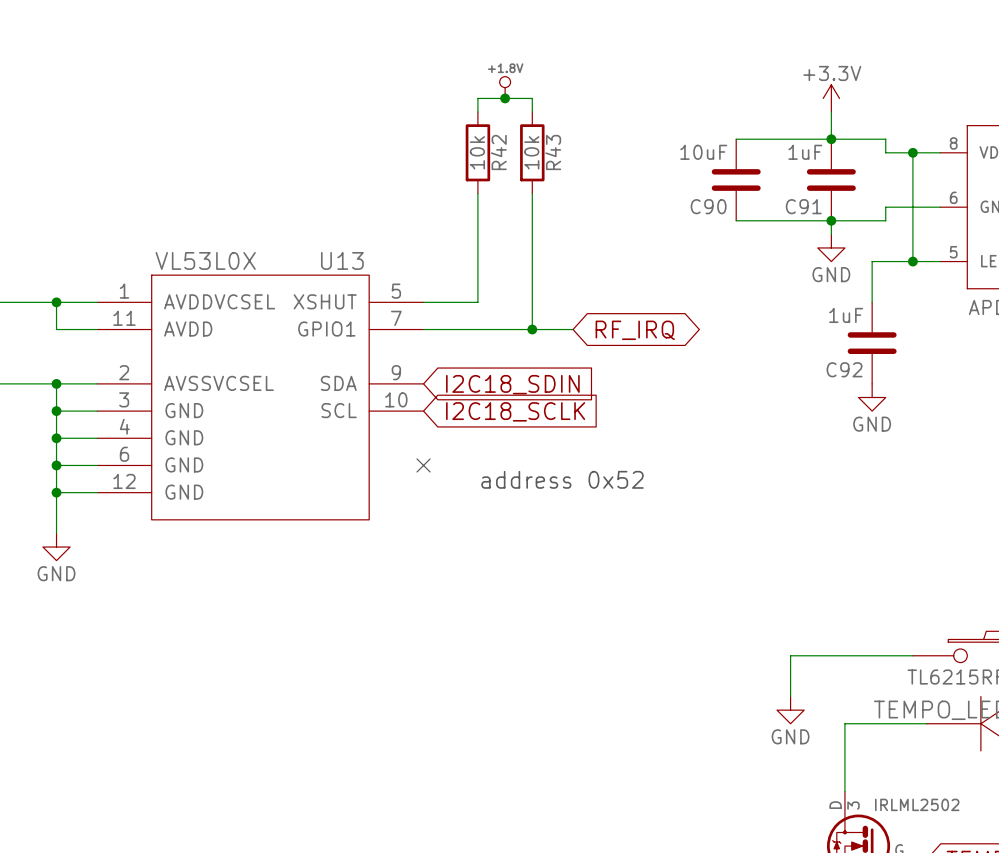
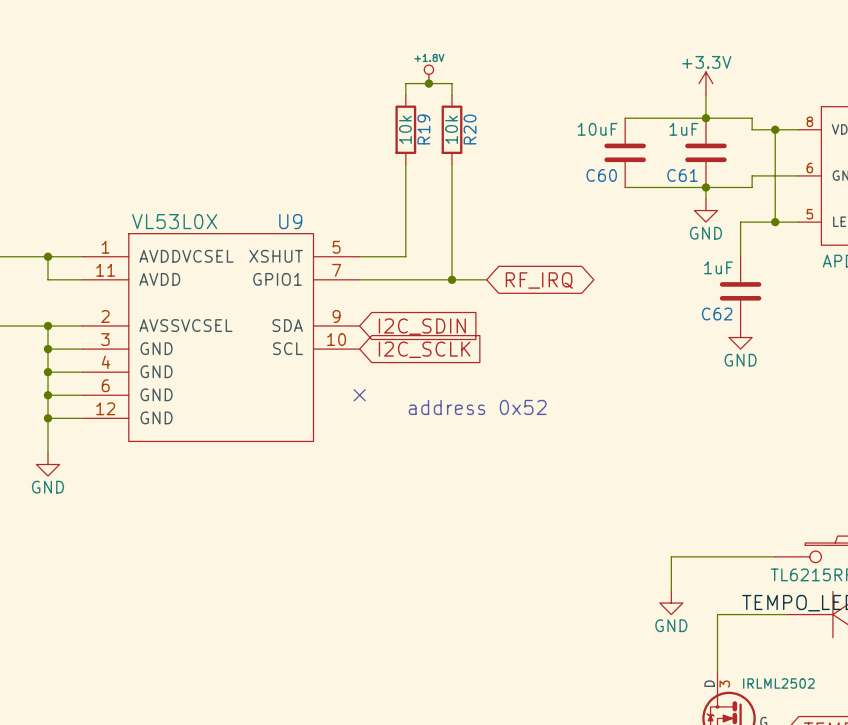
R42 name: R42 (498, 152) -> R19 (423, 129)
R43 name: R43 (553, 152) -> R20 (470, 129)
C90 name: C90 (708, 206) -> C60 (601, 175)
C91 name: C91 (803, 206) -> C61 (682, 175)
U13 name: U13 (342, 260) -> U9 (290, 221)
C92 name: C92 (844, 369) -> C62 (717, 314)
global label: I2C18_SDIN (512, 384) -> I2C_SDIN (422, 326)
global label: I2C18_SCLK (515, 411) -> I2C_SCLK (424, 349)

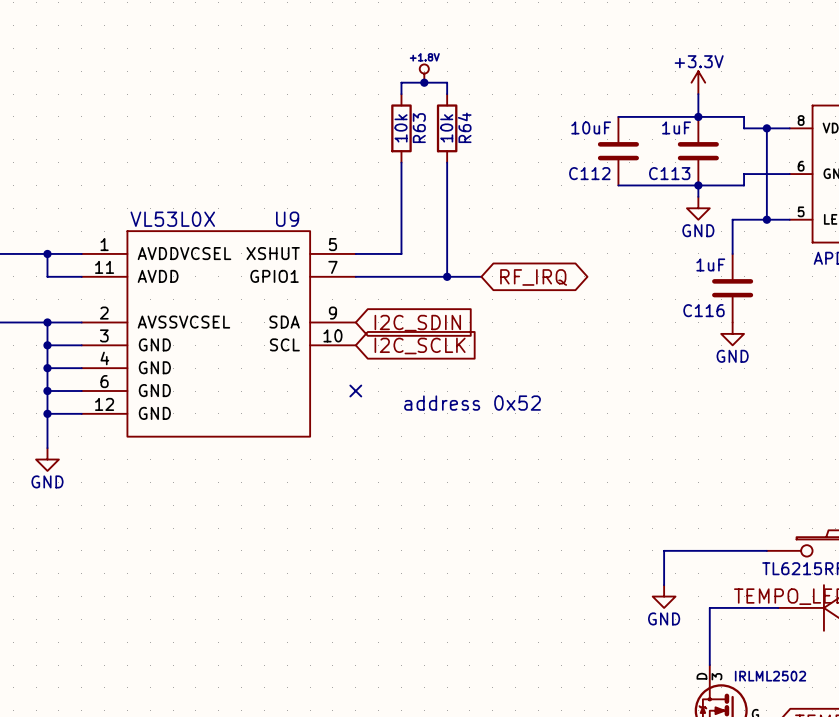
R19 name: R19 (423, 129) -> R63 (419, 128)
R20 name: R20 (470, 129) -> R64 (464, 127)
C60 name: C60 (601, 175) -> C112 (589, 173)
C61 name: C61 (682, 175) -> C113 (669, 173)
C62 name: C62 (717, 314) -> C116 (703, 310)

